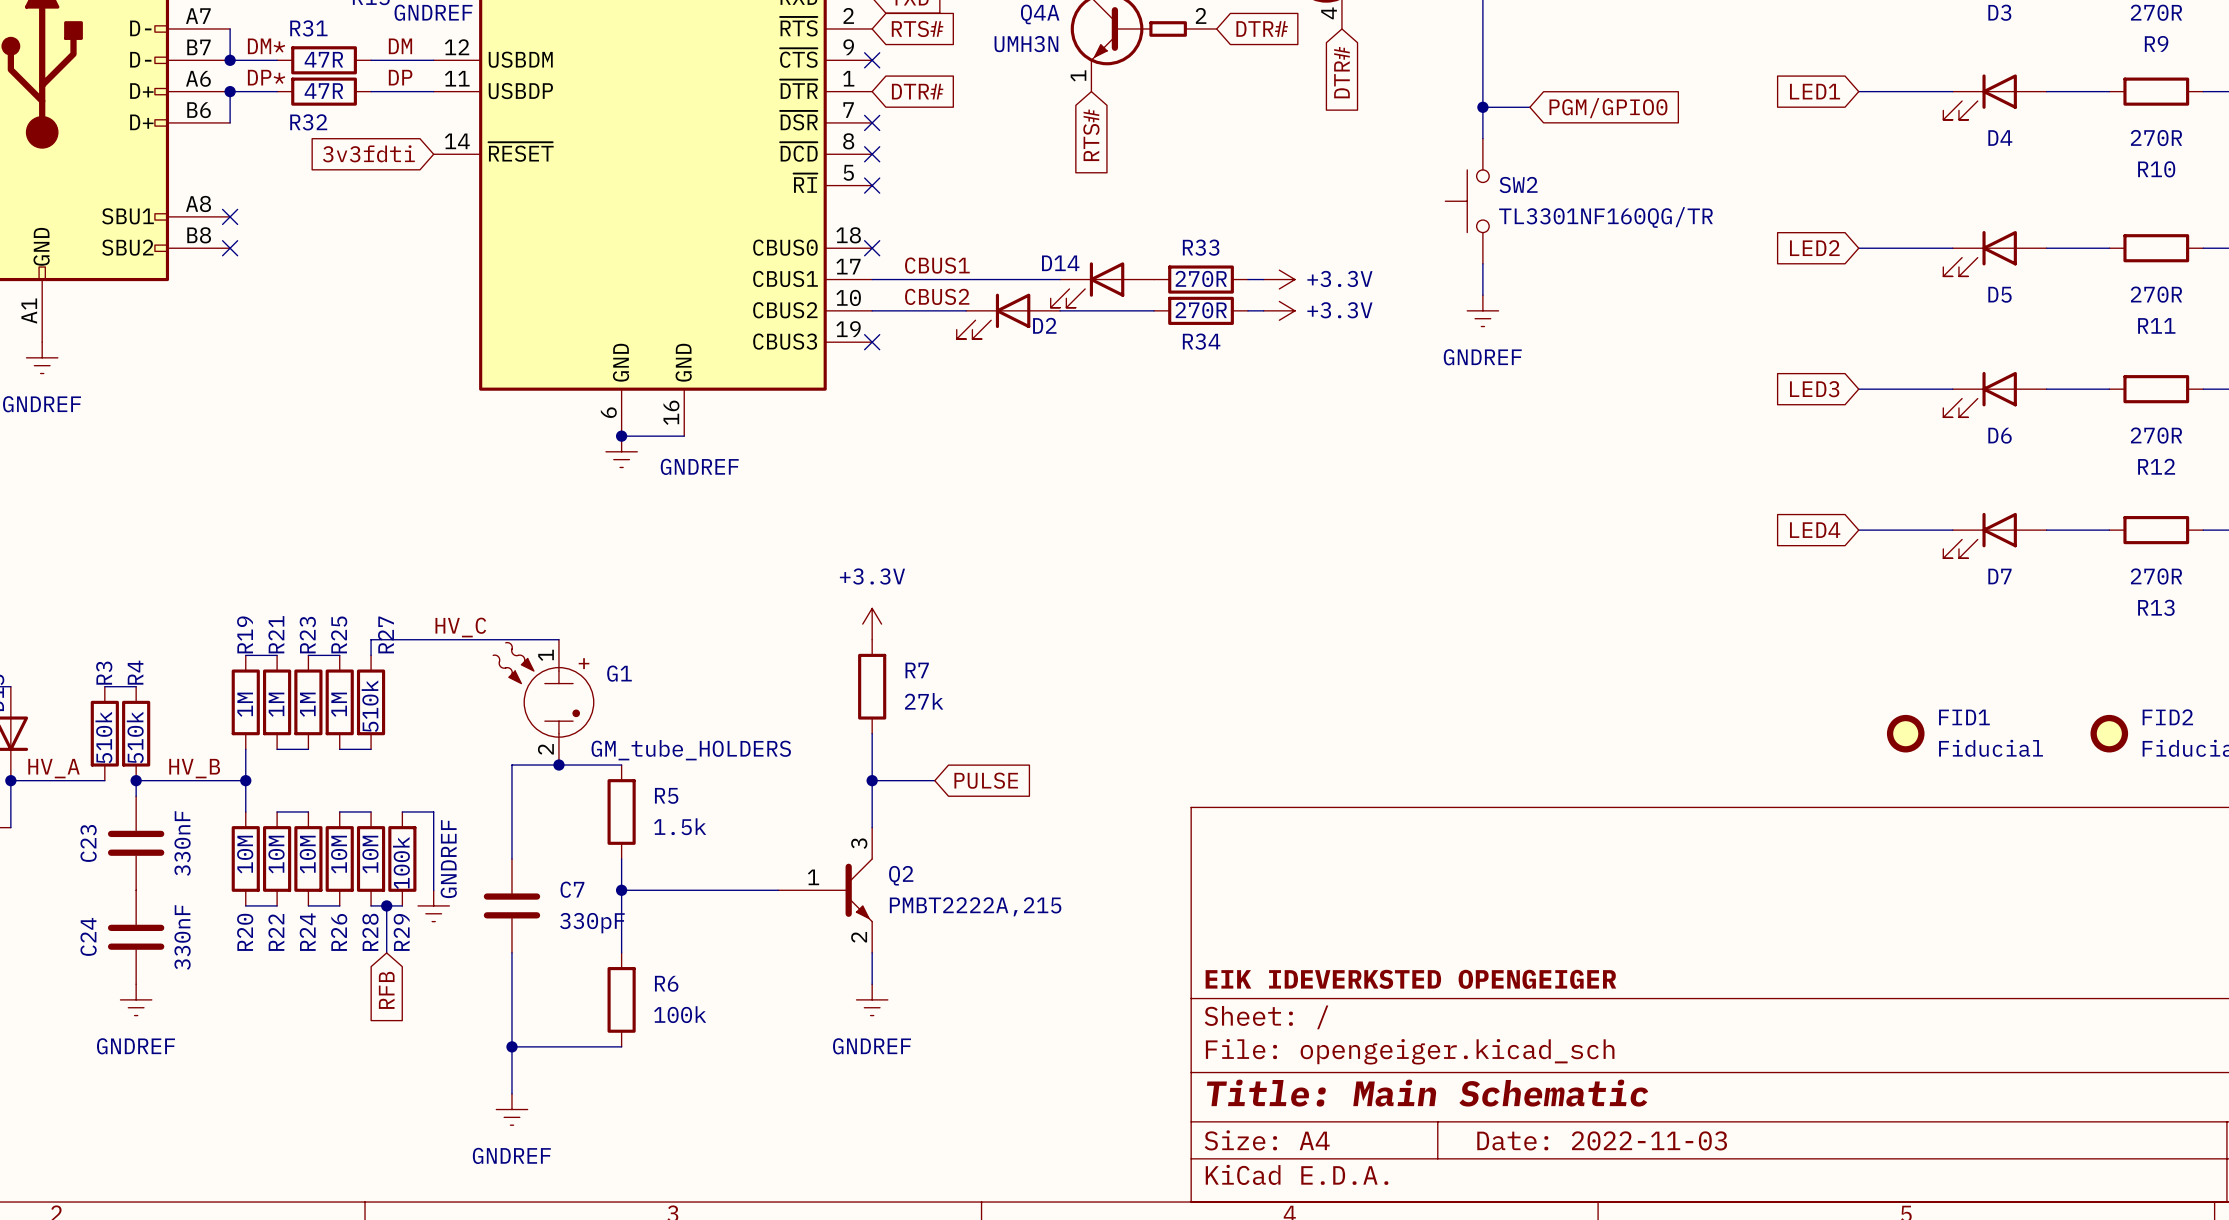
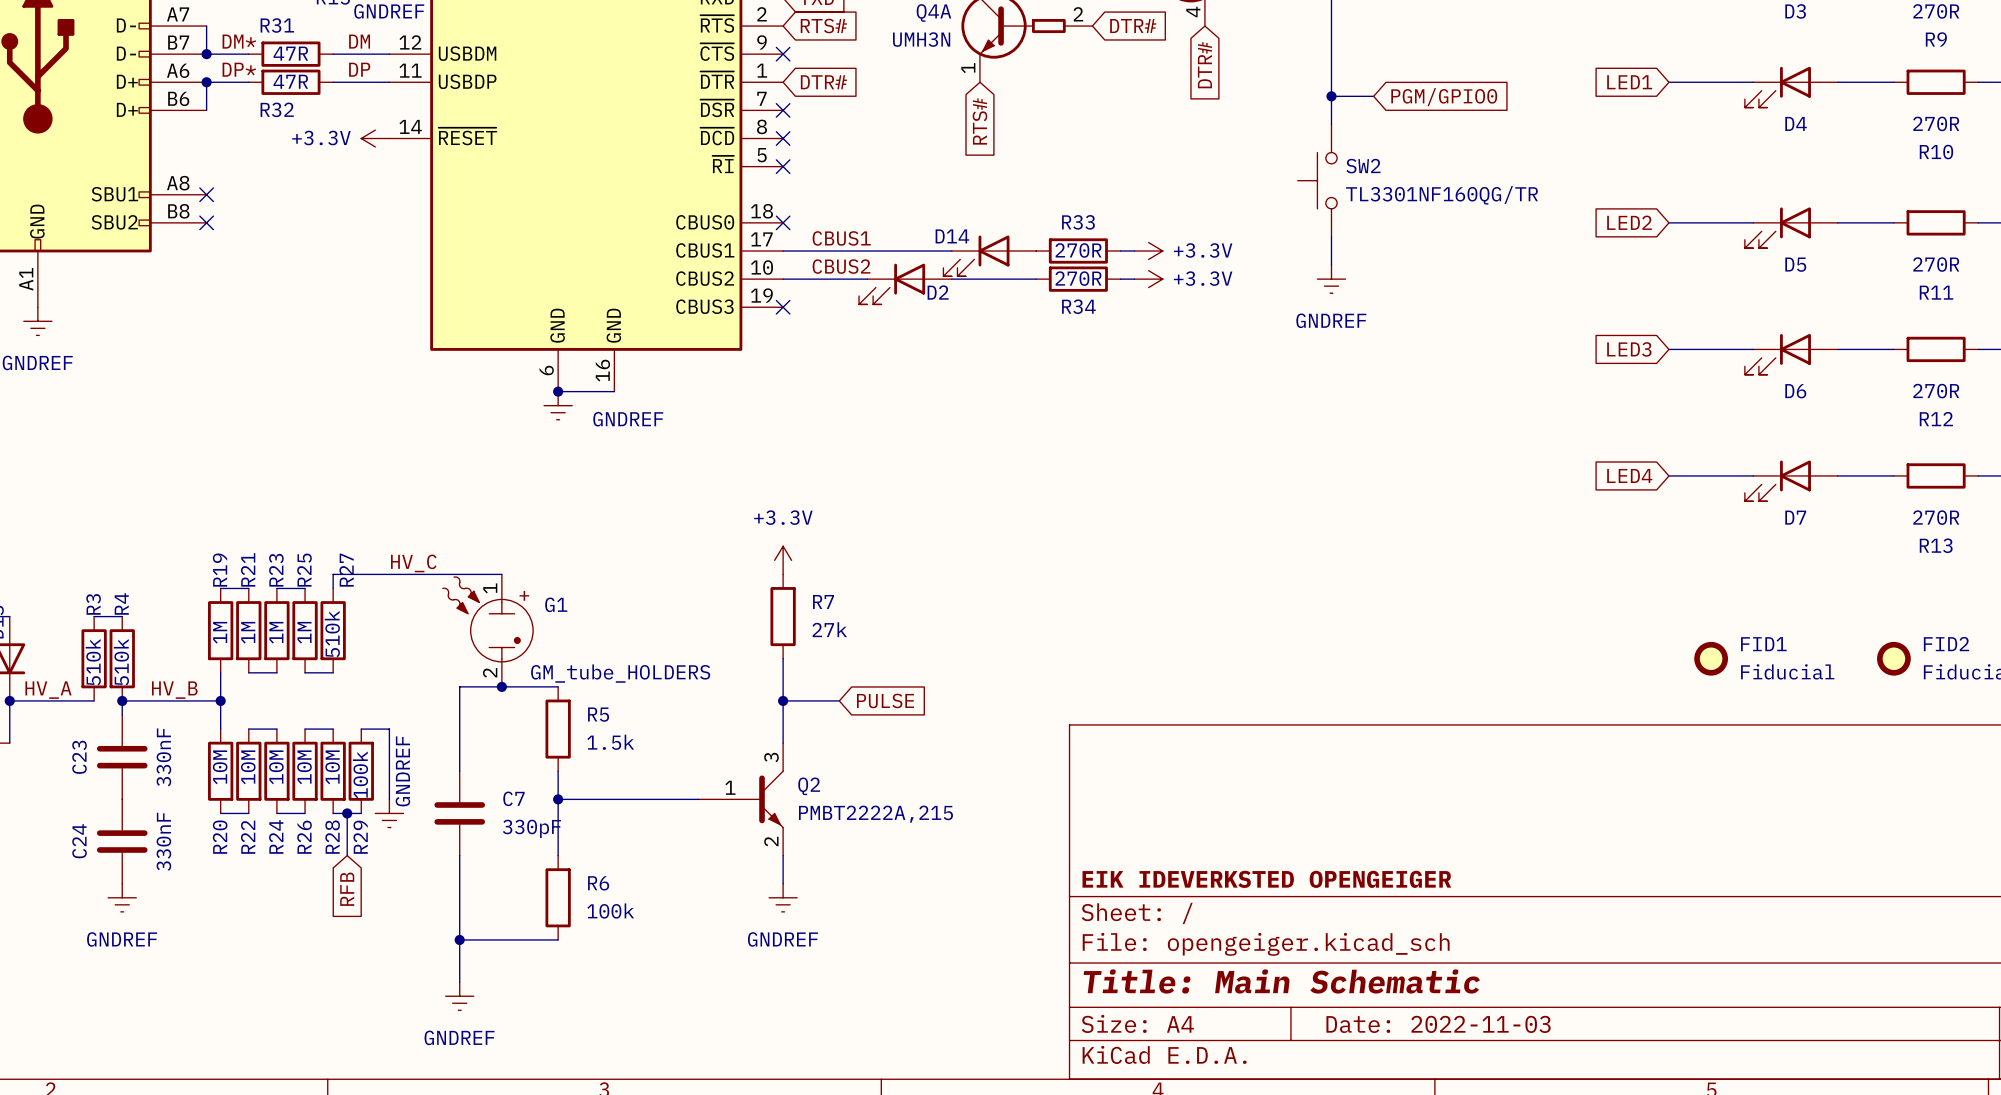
global label: 3v3fdti (368, 153) -> none
power symbol: none -> +3.3V (375, 138)

